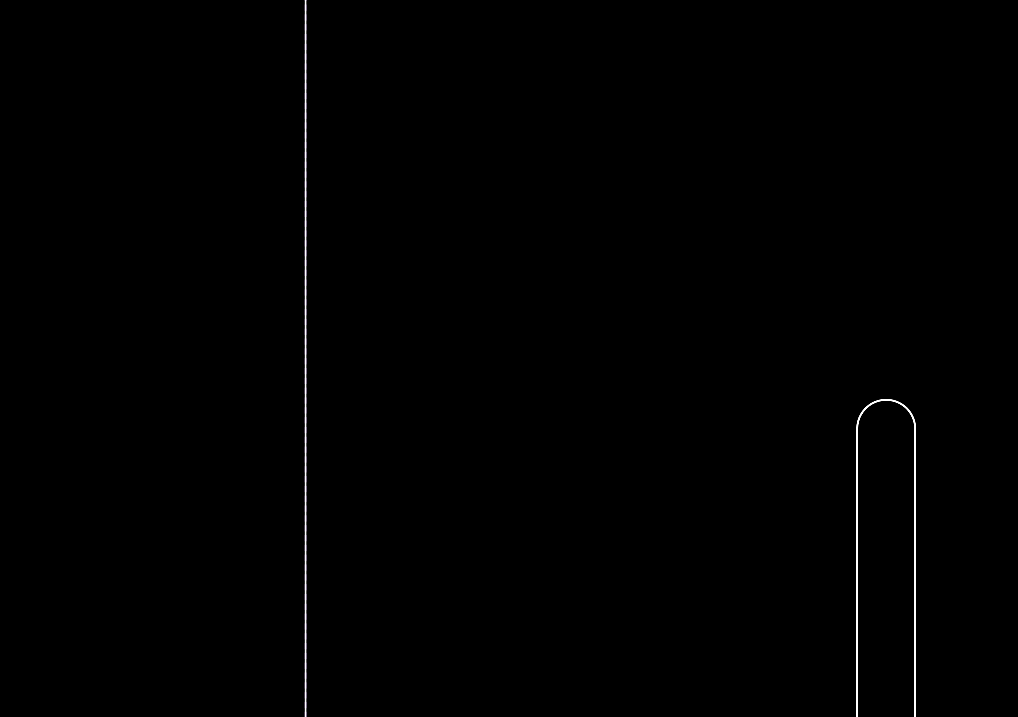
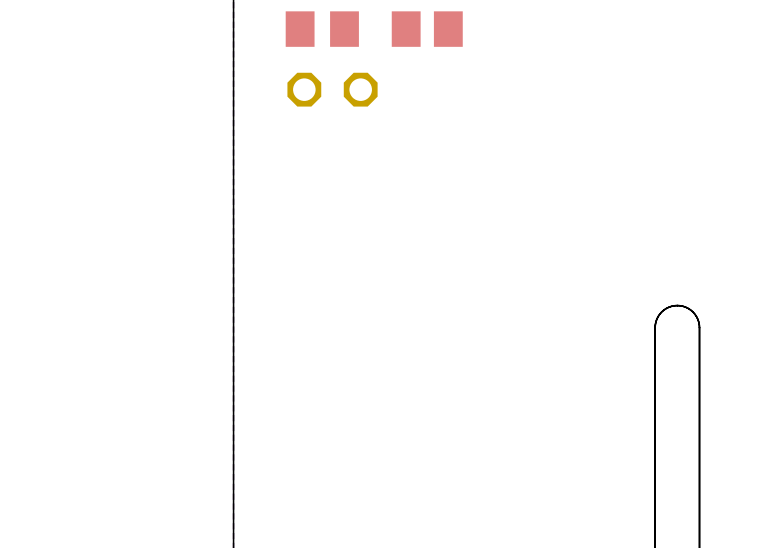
part: none -> (322, 29)
part: none -> (427, 29)
part: none -> (332, 89)

